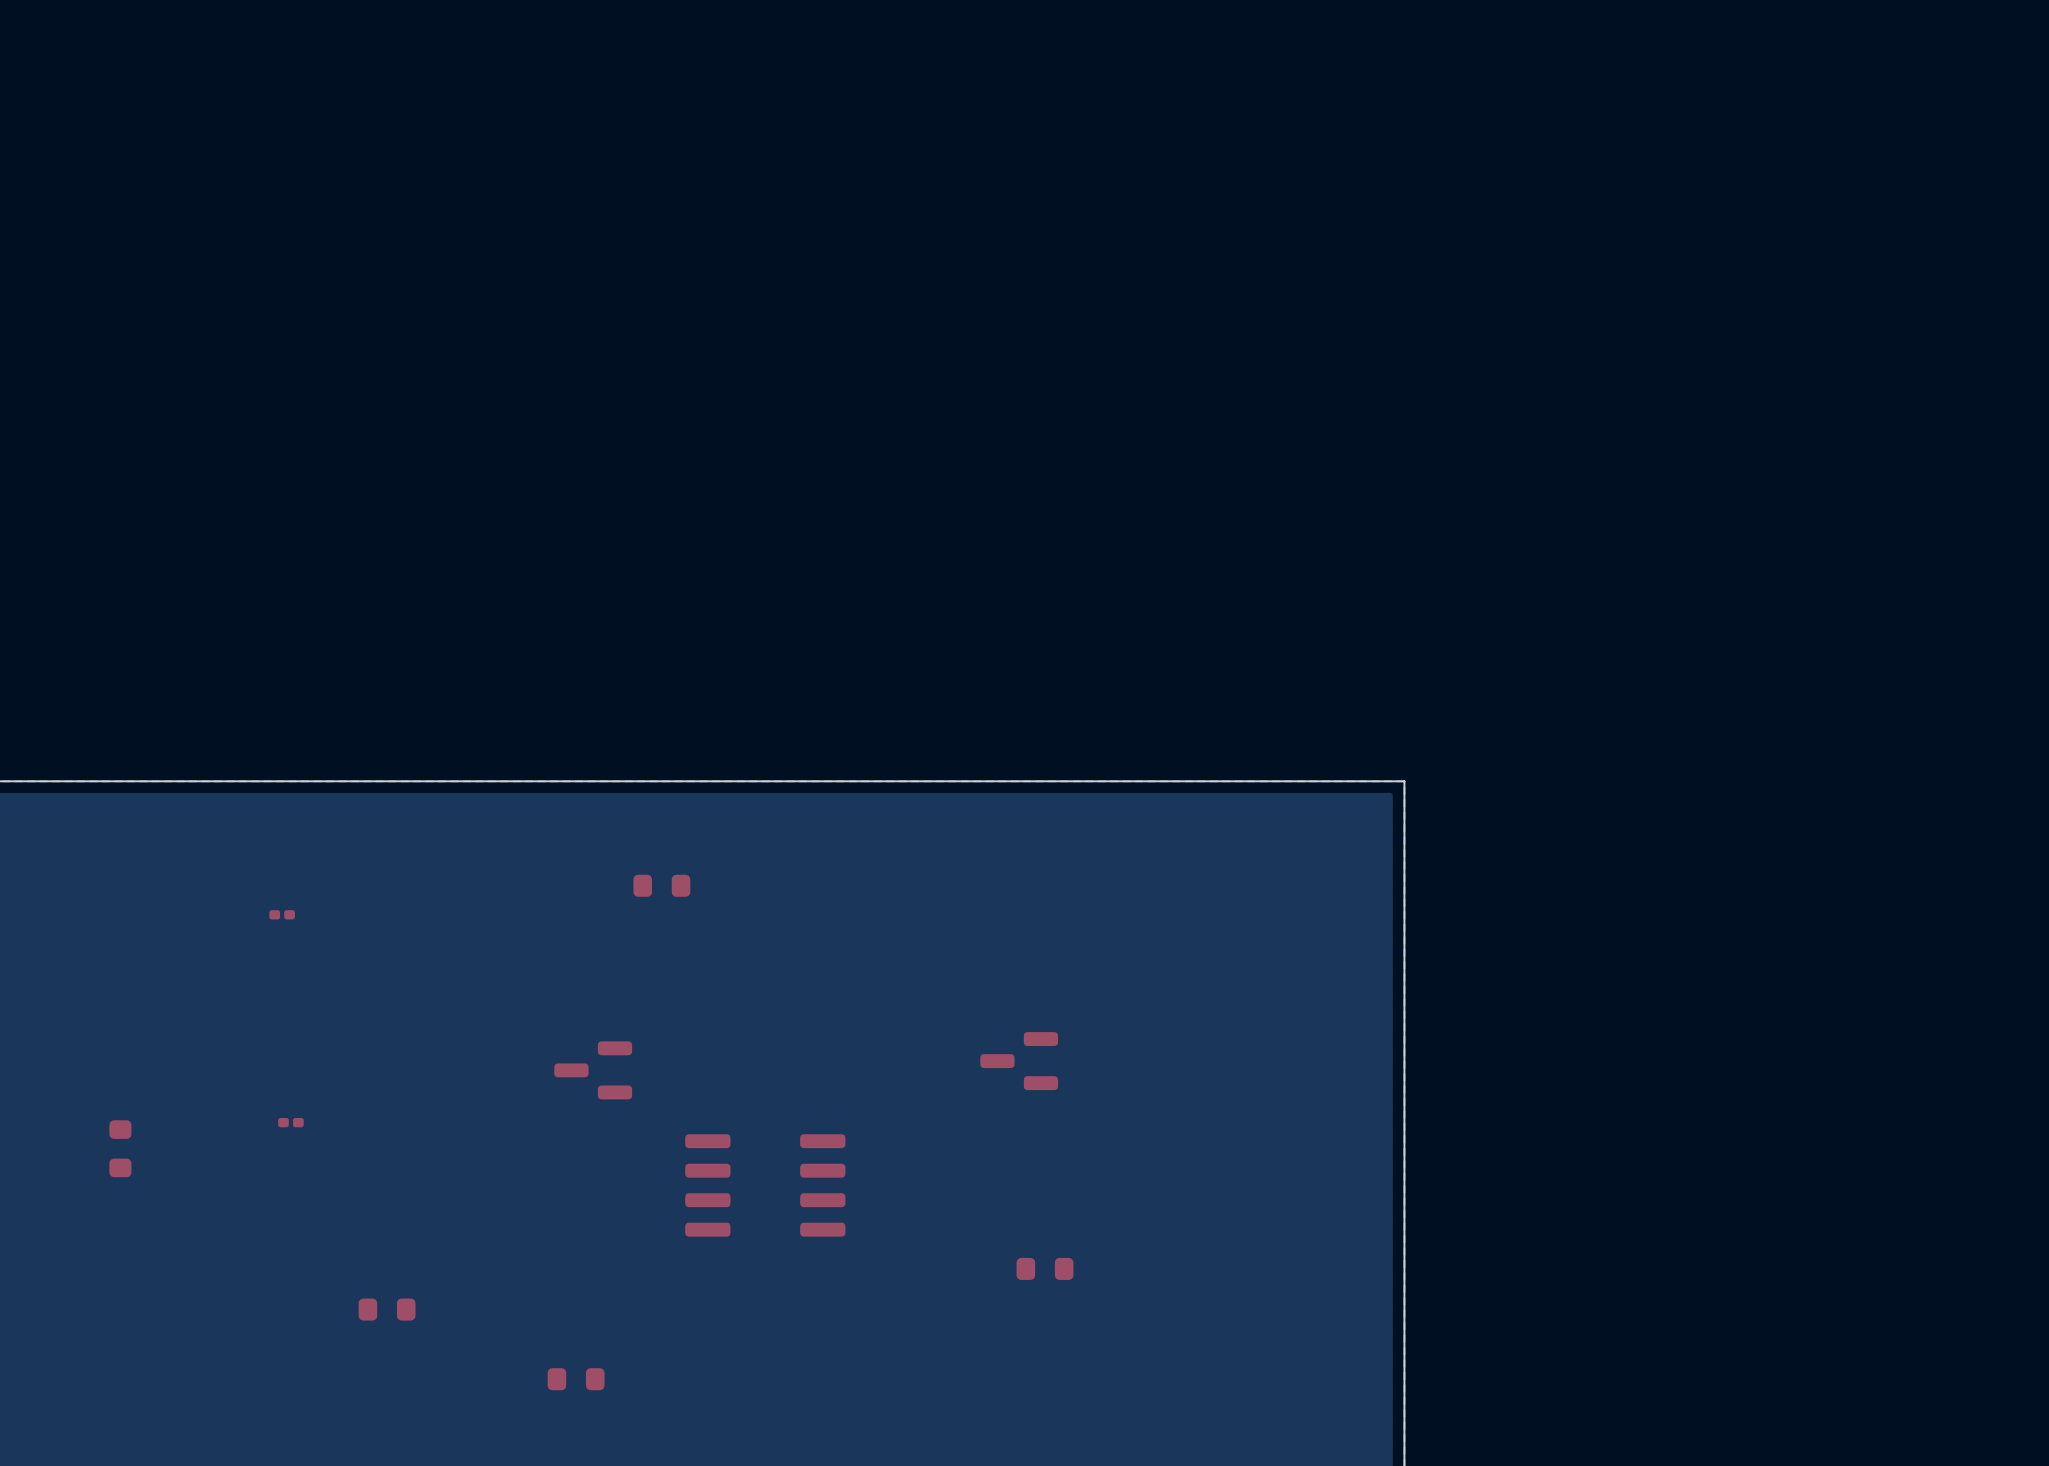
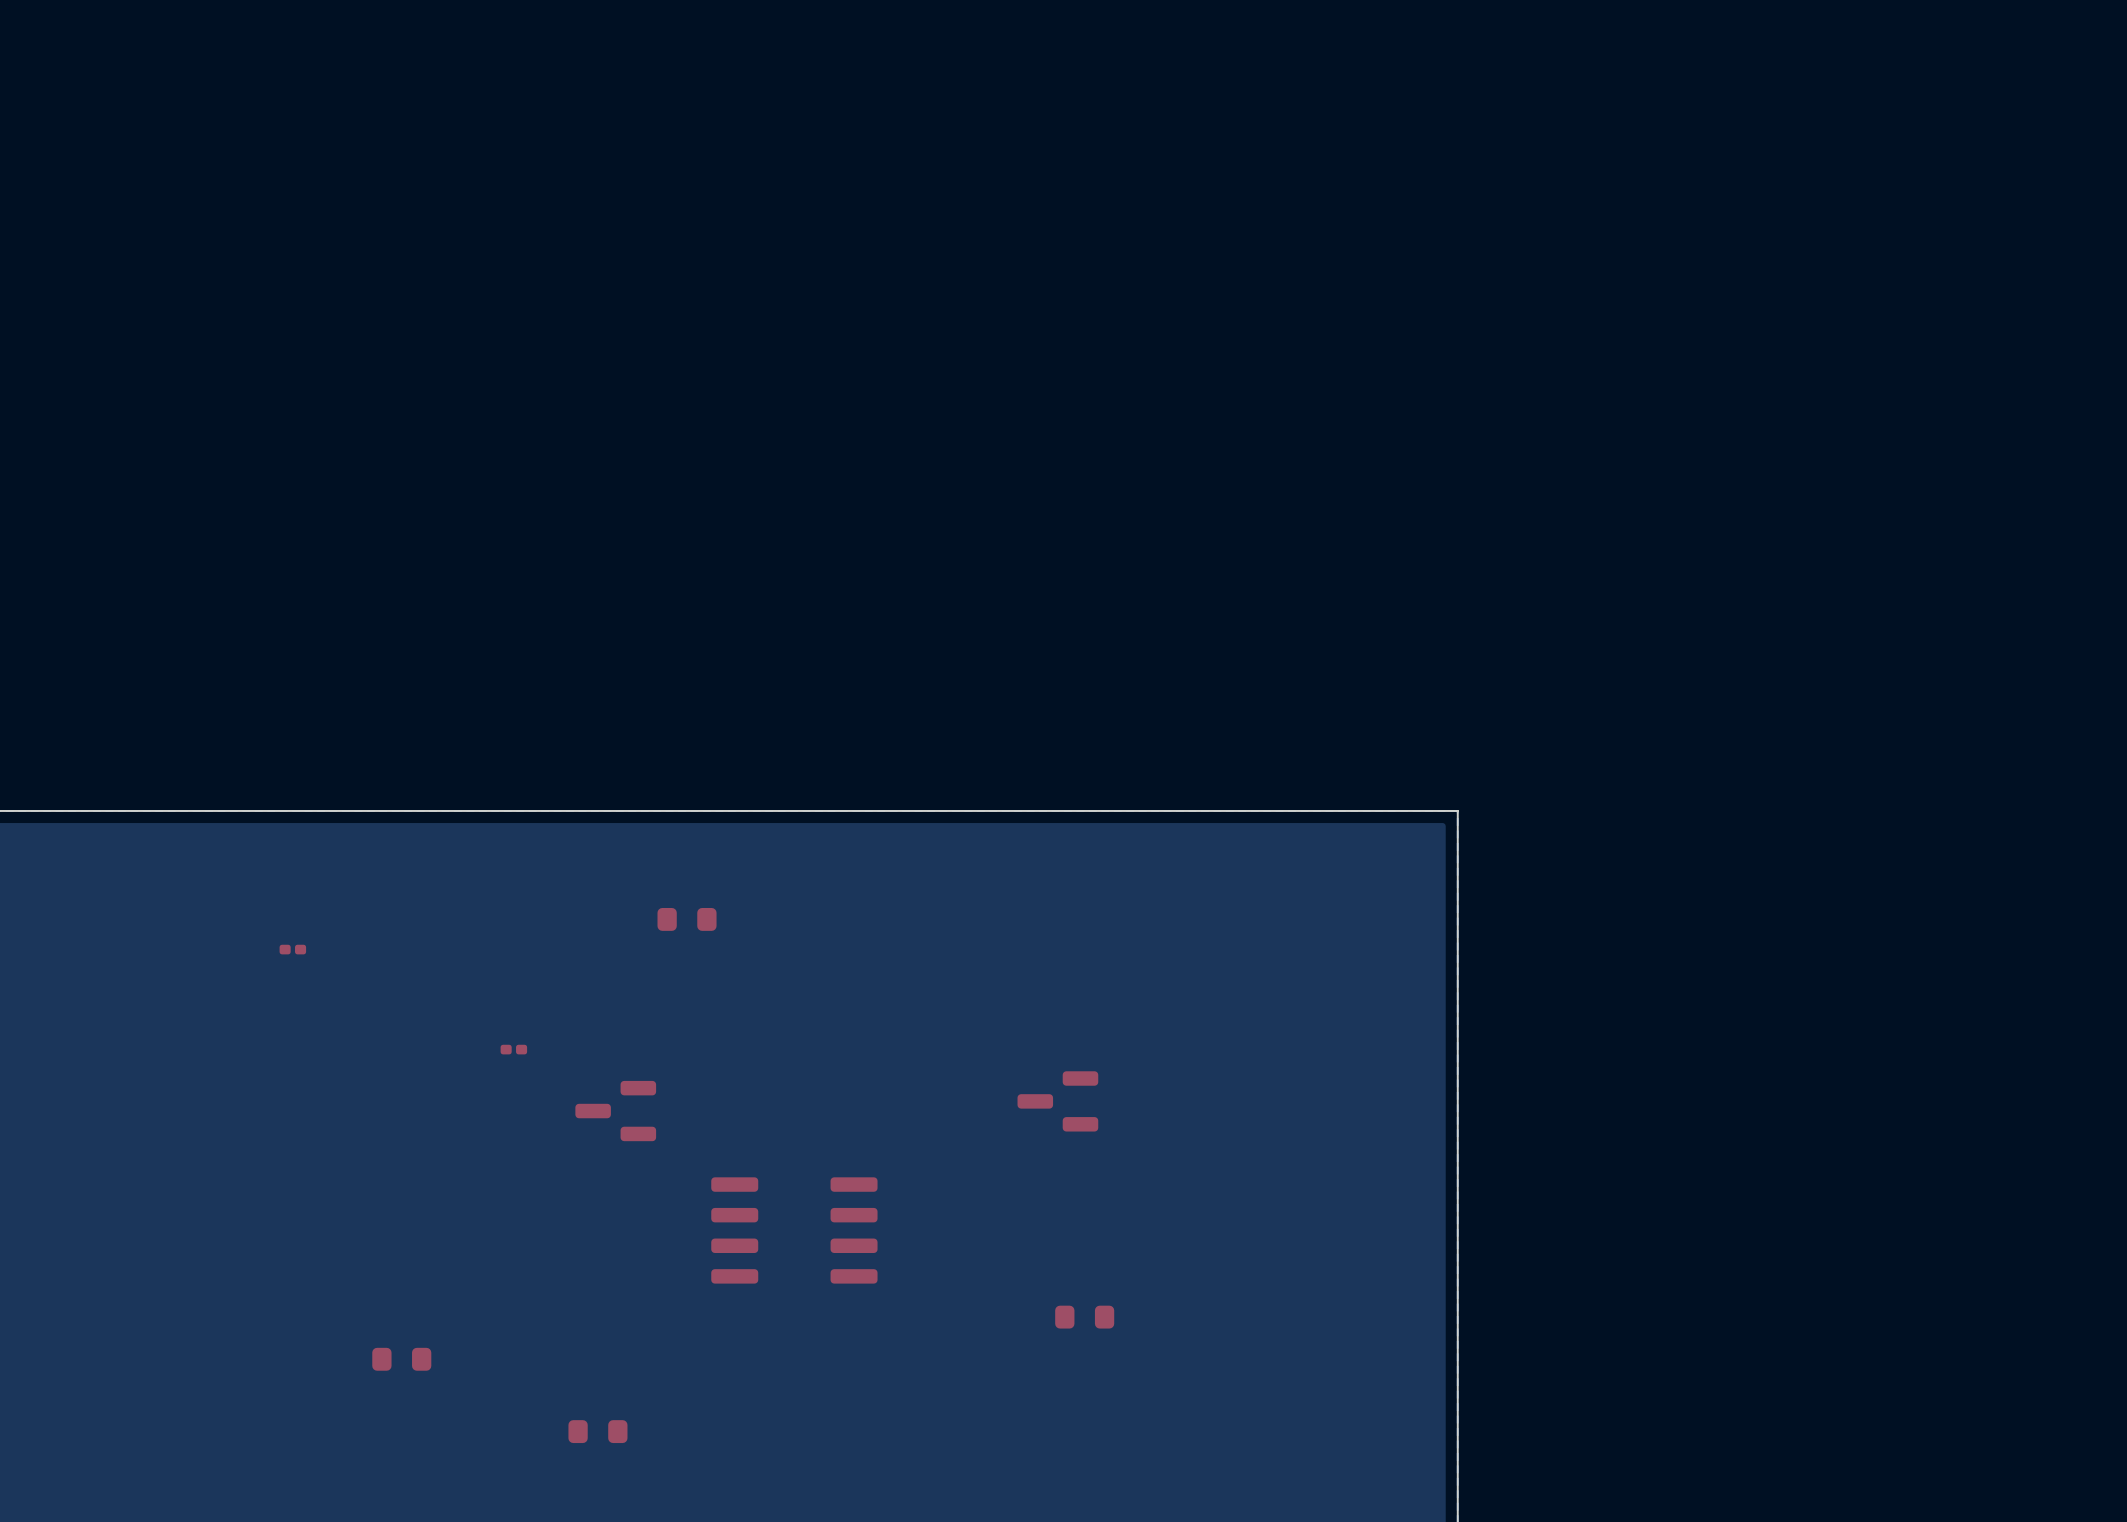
part position: (290, 1122) -> (513, 1049)
part: (120, 1148) -> none

